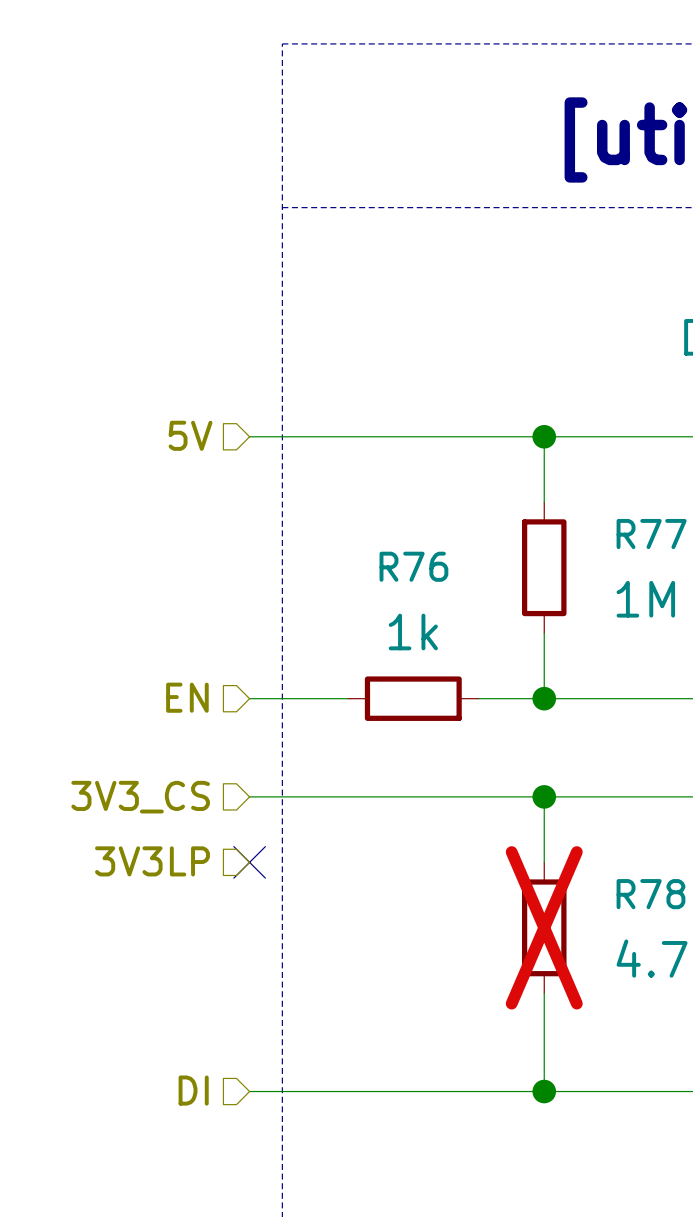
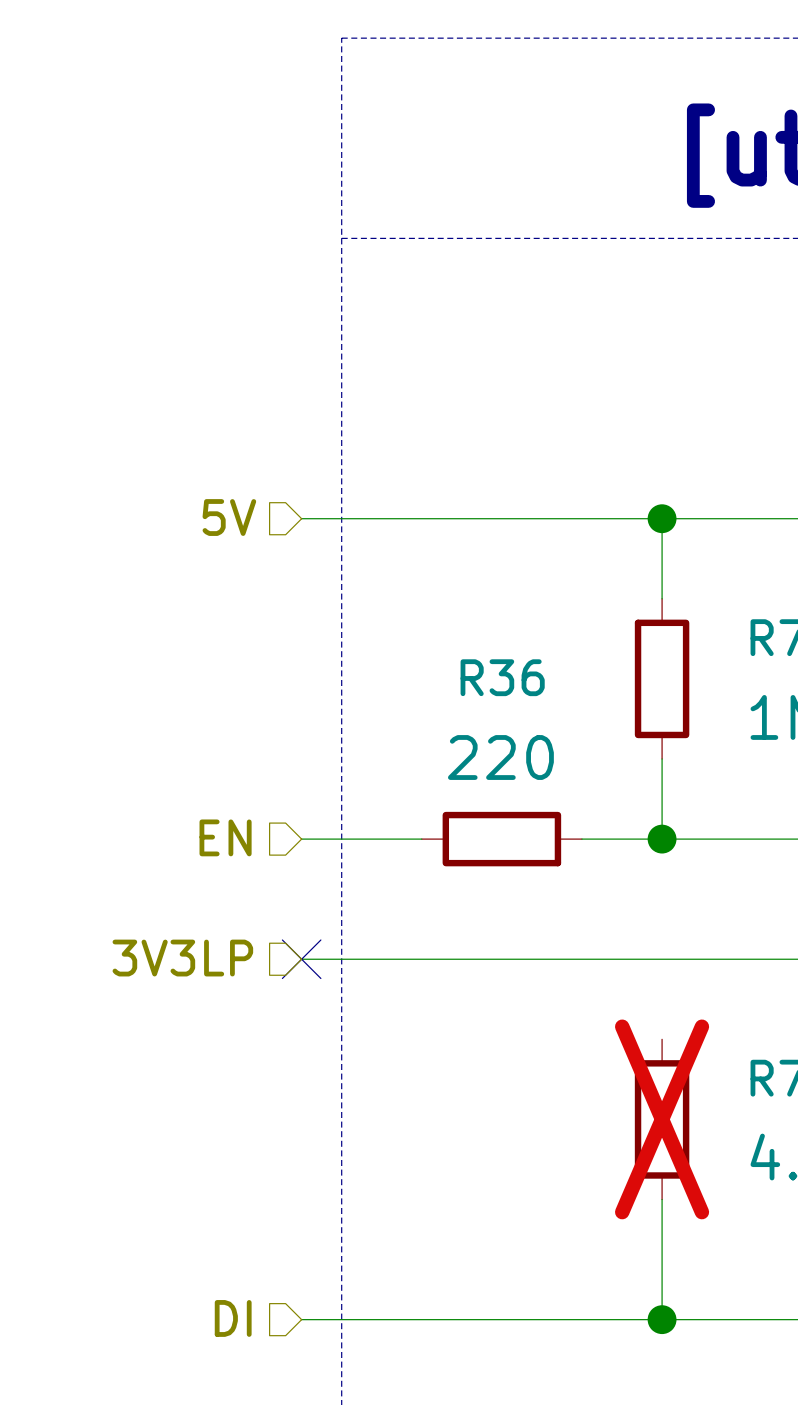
R76 name: R76 (413, 566) -> R36 (502, 677)
R76 value: 1k (413, 631) -> 220 (500, 757)
wire: (544, 796) (544, 862) -> none
junction: (544, 796) -> none
hierarchical label: 3V3_CS (140, 797) -> 3V3LP (182, 958)
hierarchical label: 3V3LP (152, 861) -> none
no-connect mark position: (249, 862) -> (301, 959)

